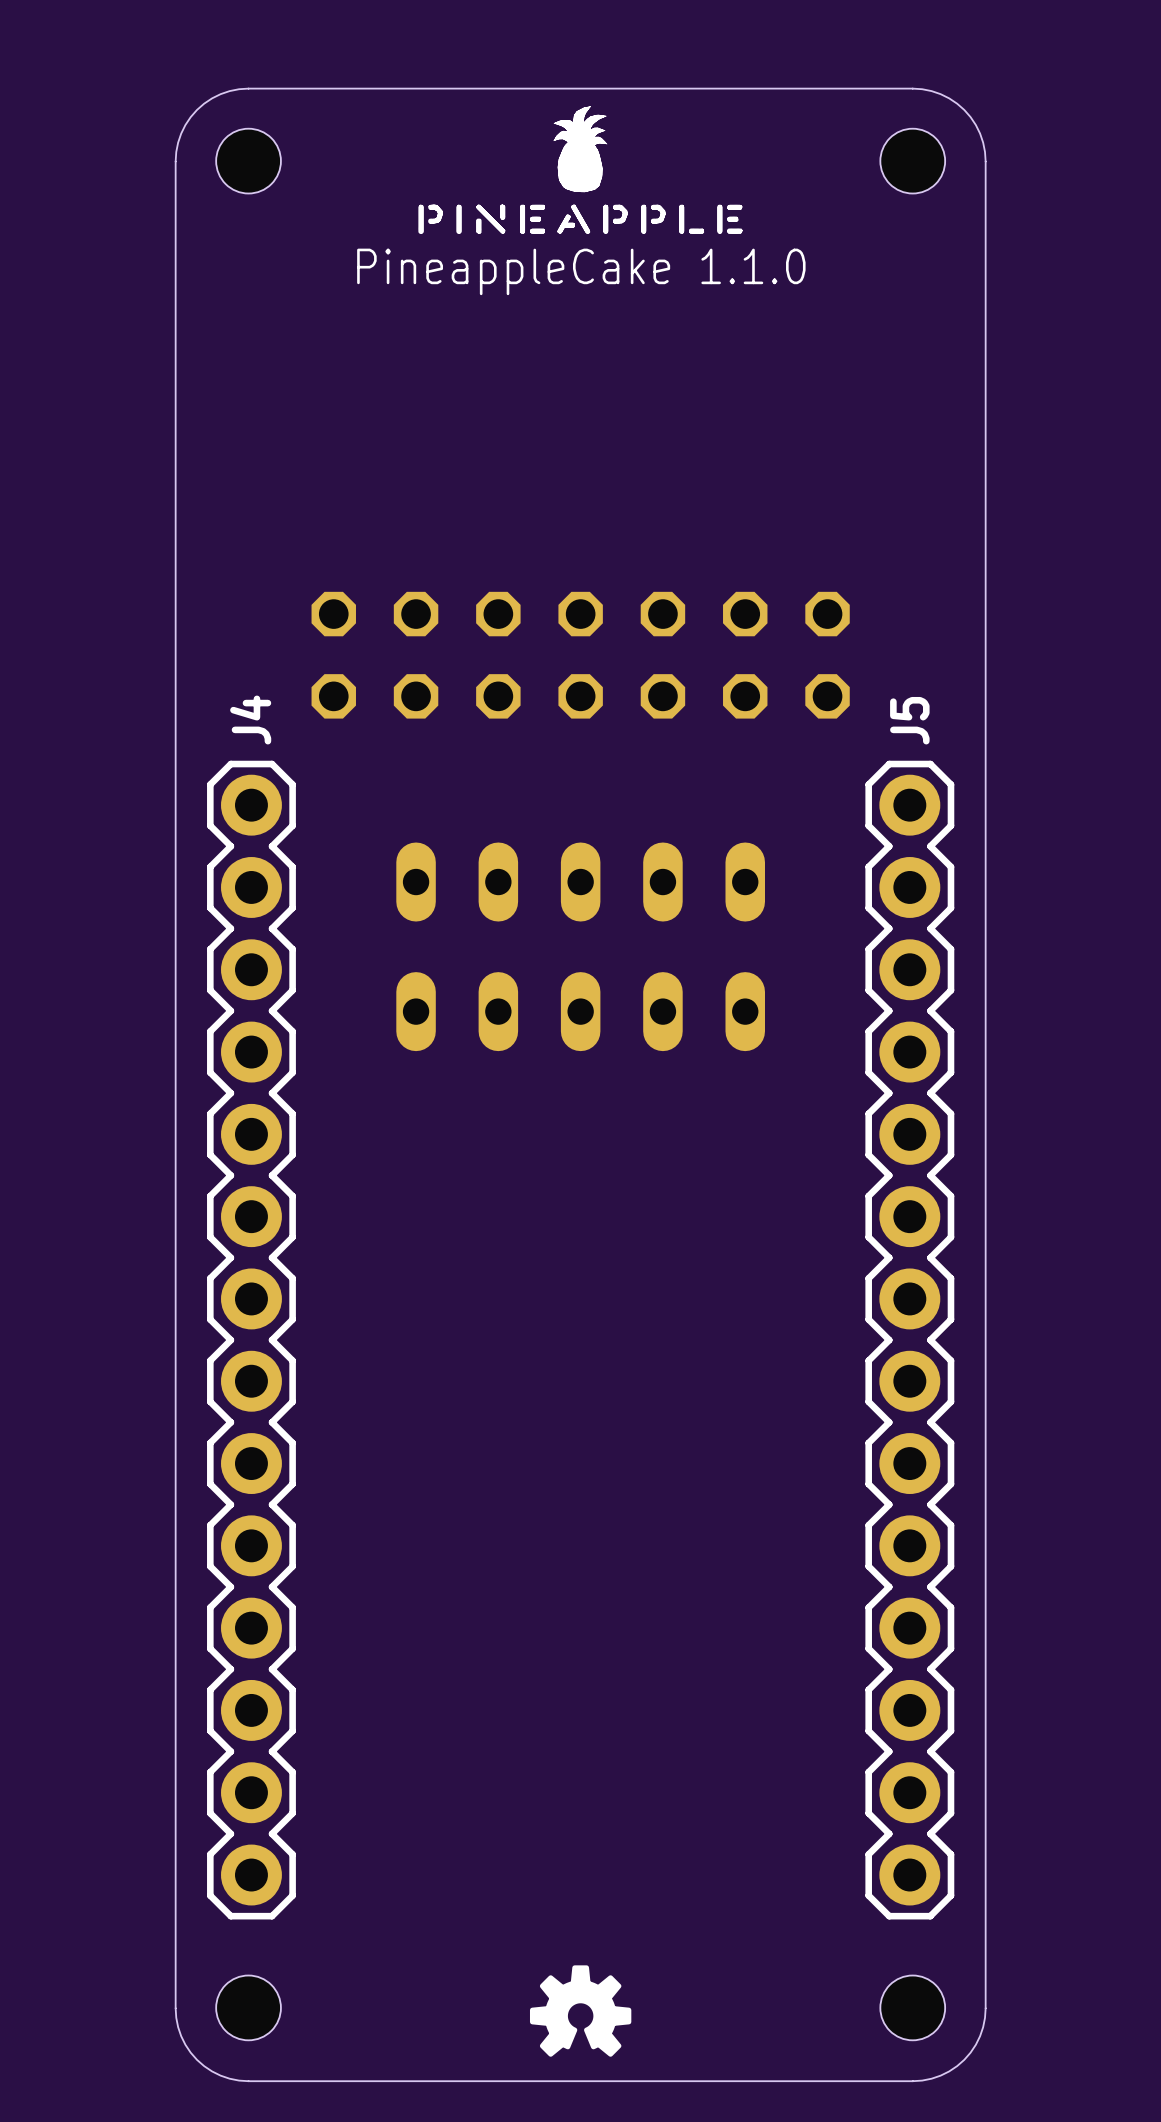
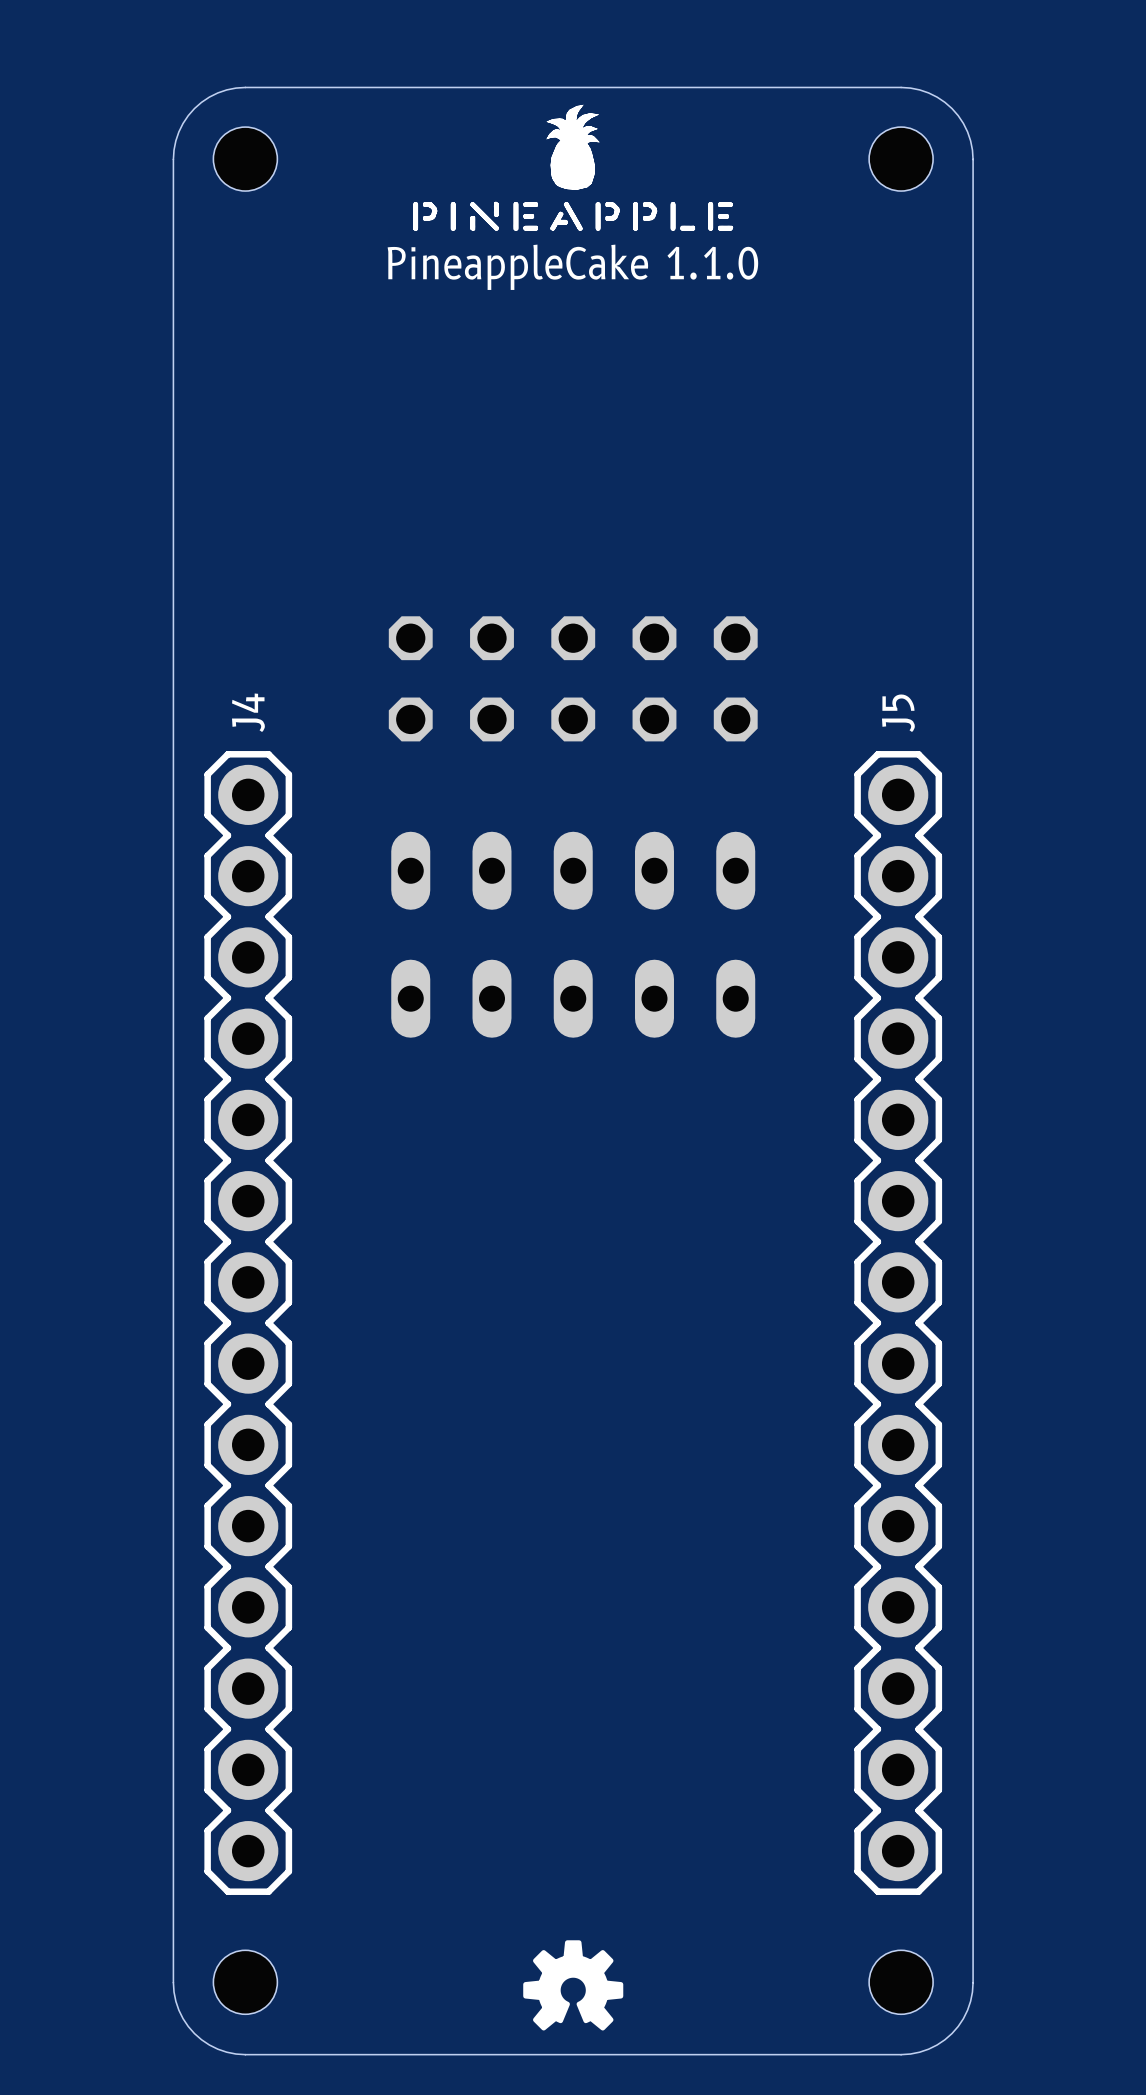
part footprint: [311, 591, 850, 719] -> [388, 616, 758, 742]

